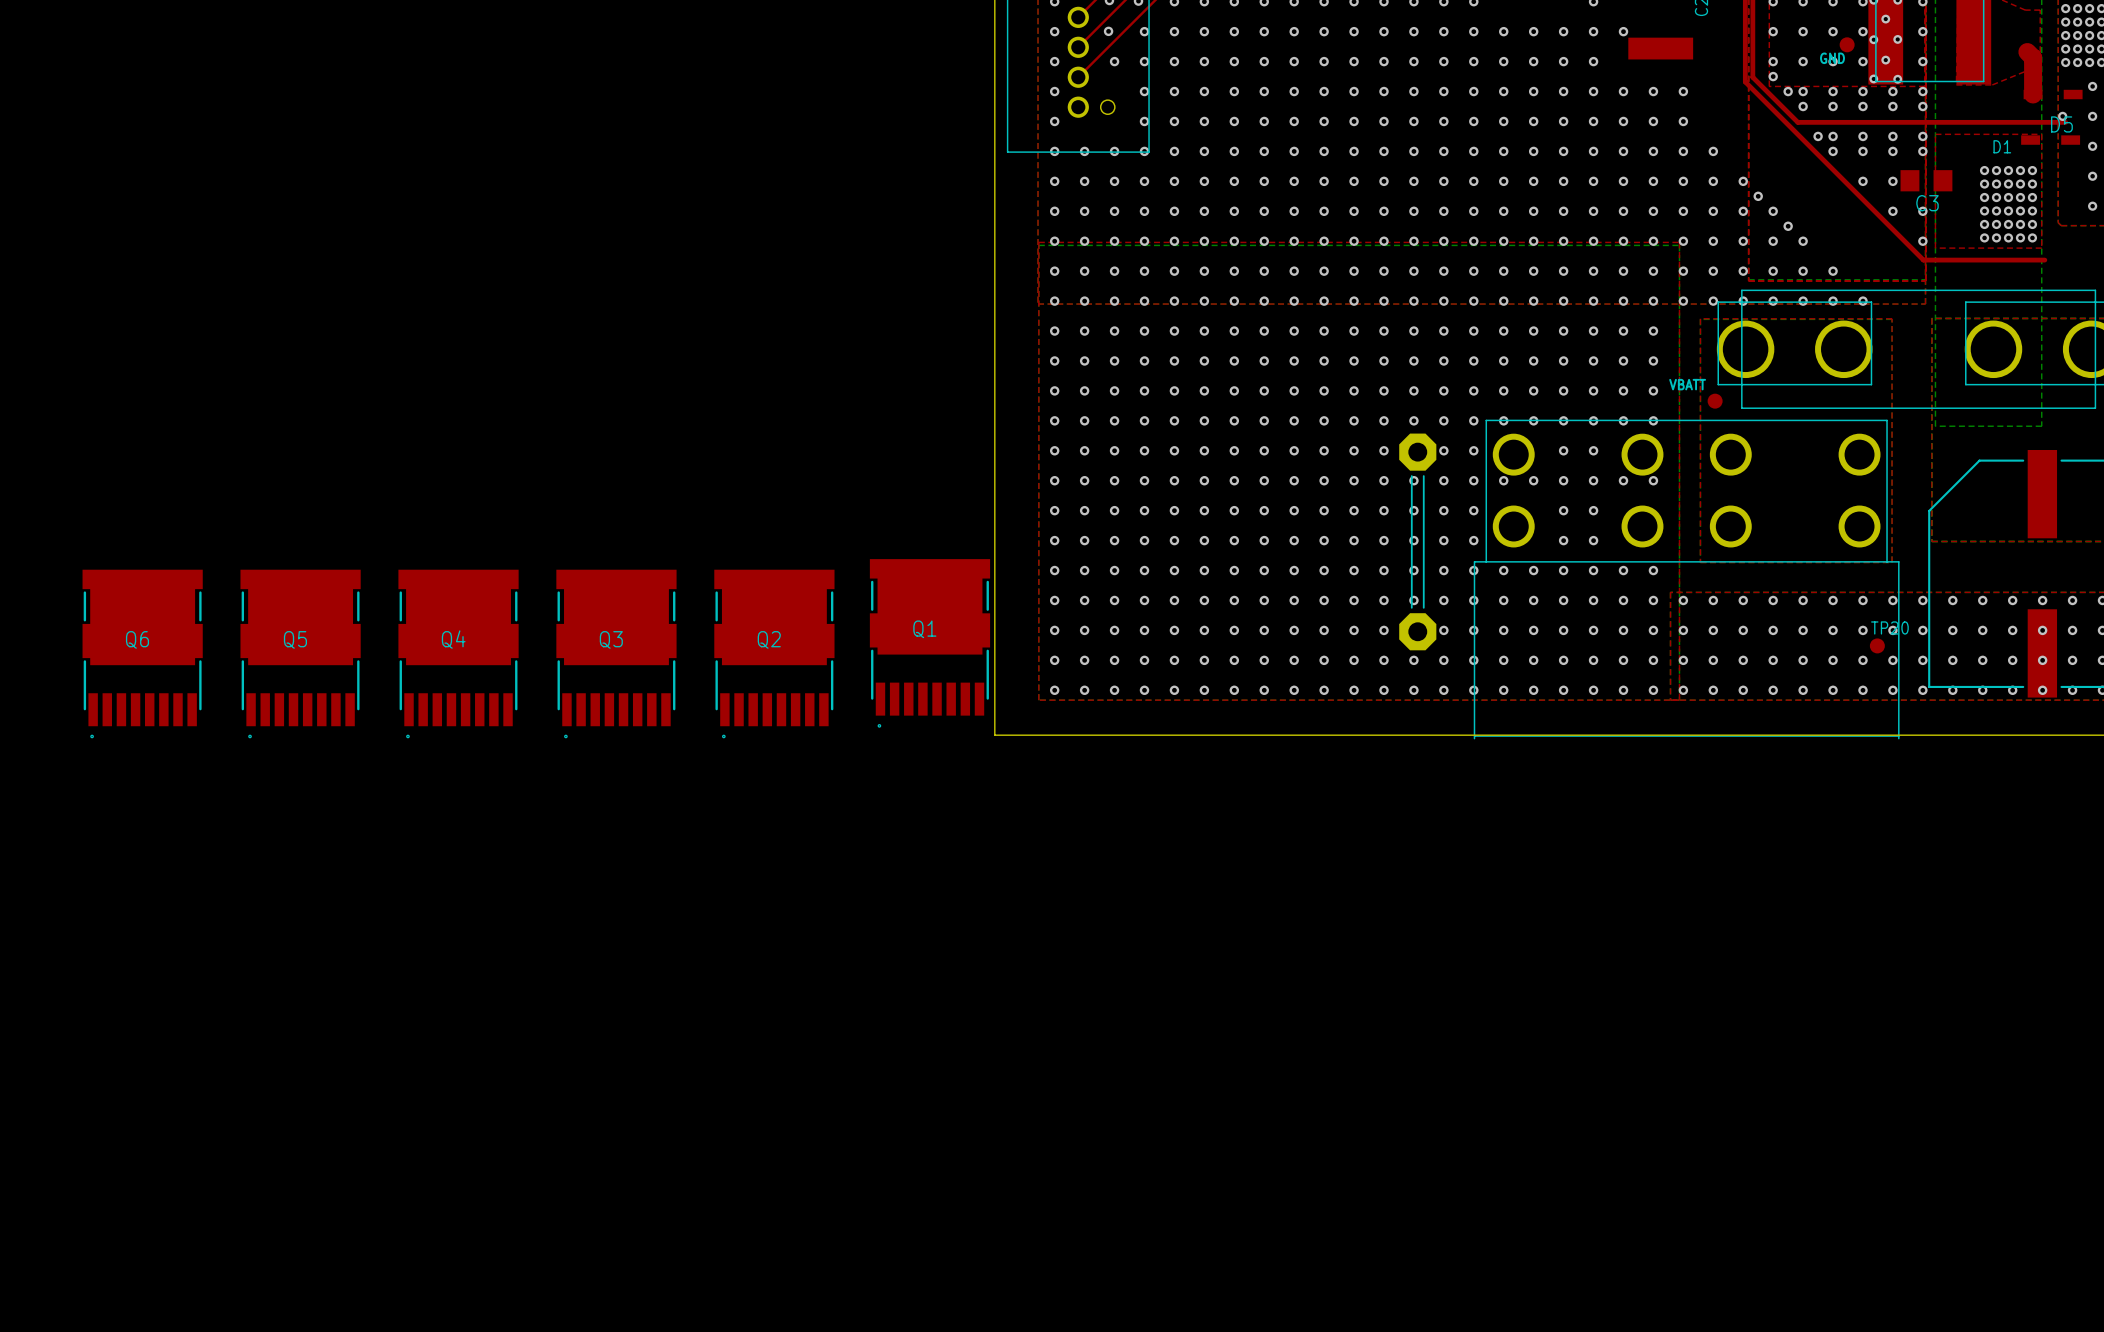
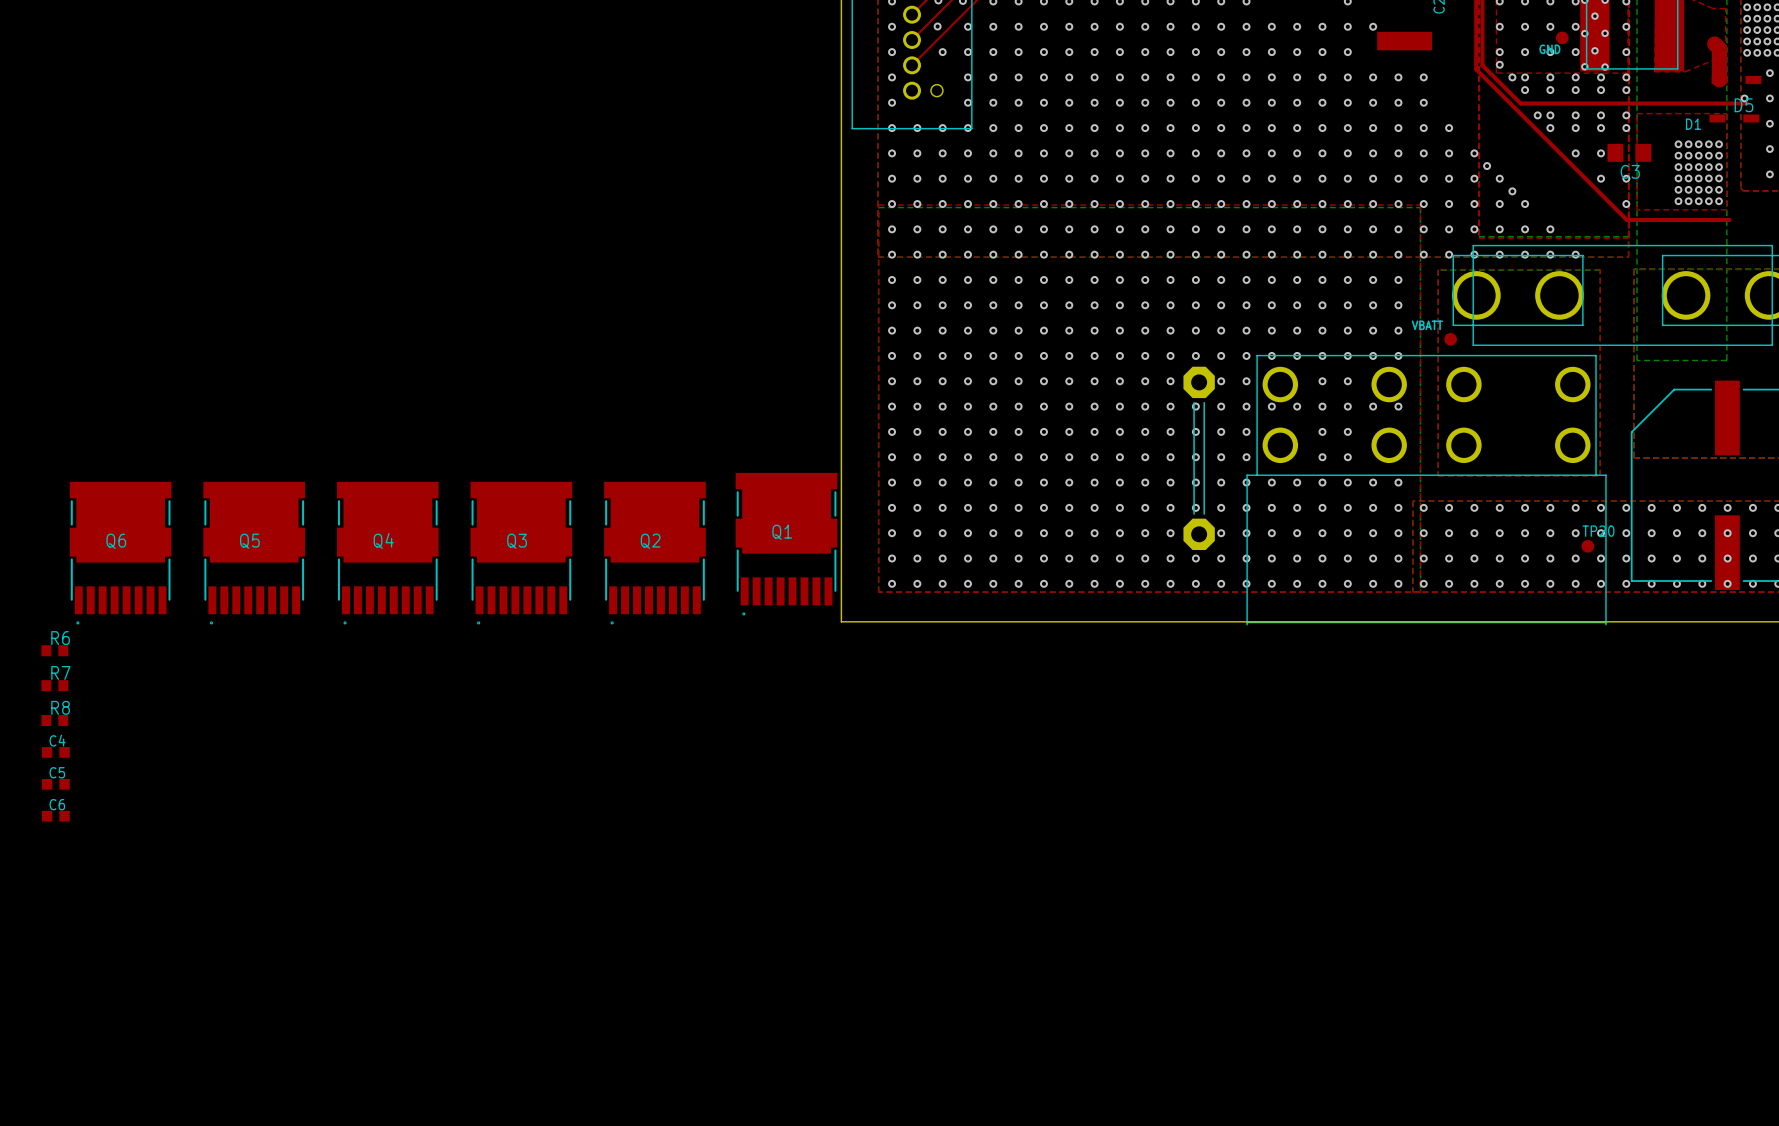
R6: none -> (54, 650)
R7: none -> (54, 685)
R8: none -> (54, 720)
C4: none -> (55, 752)
C5: none -> (55, 784)
C6: none -> (55, 816)

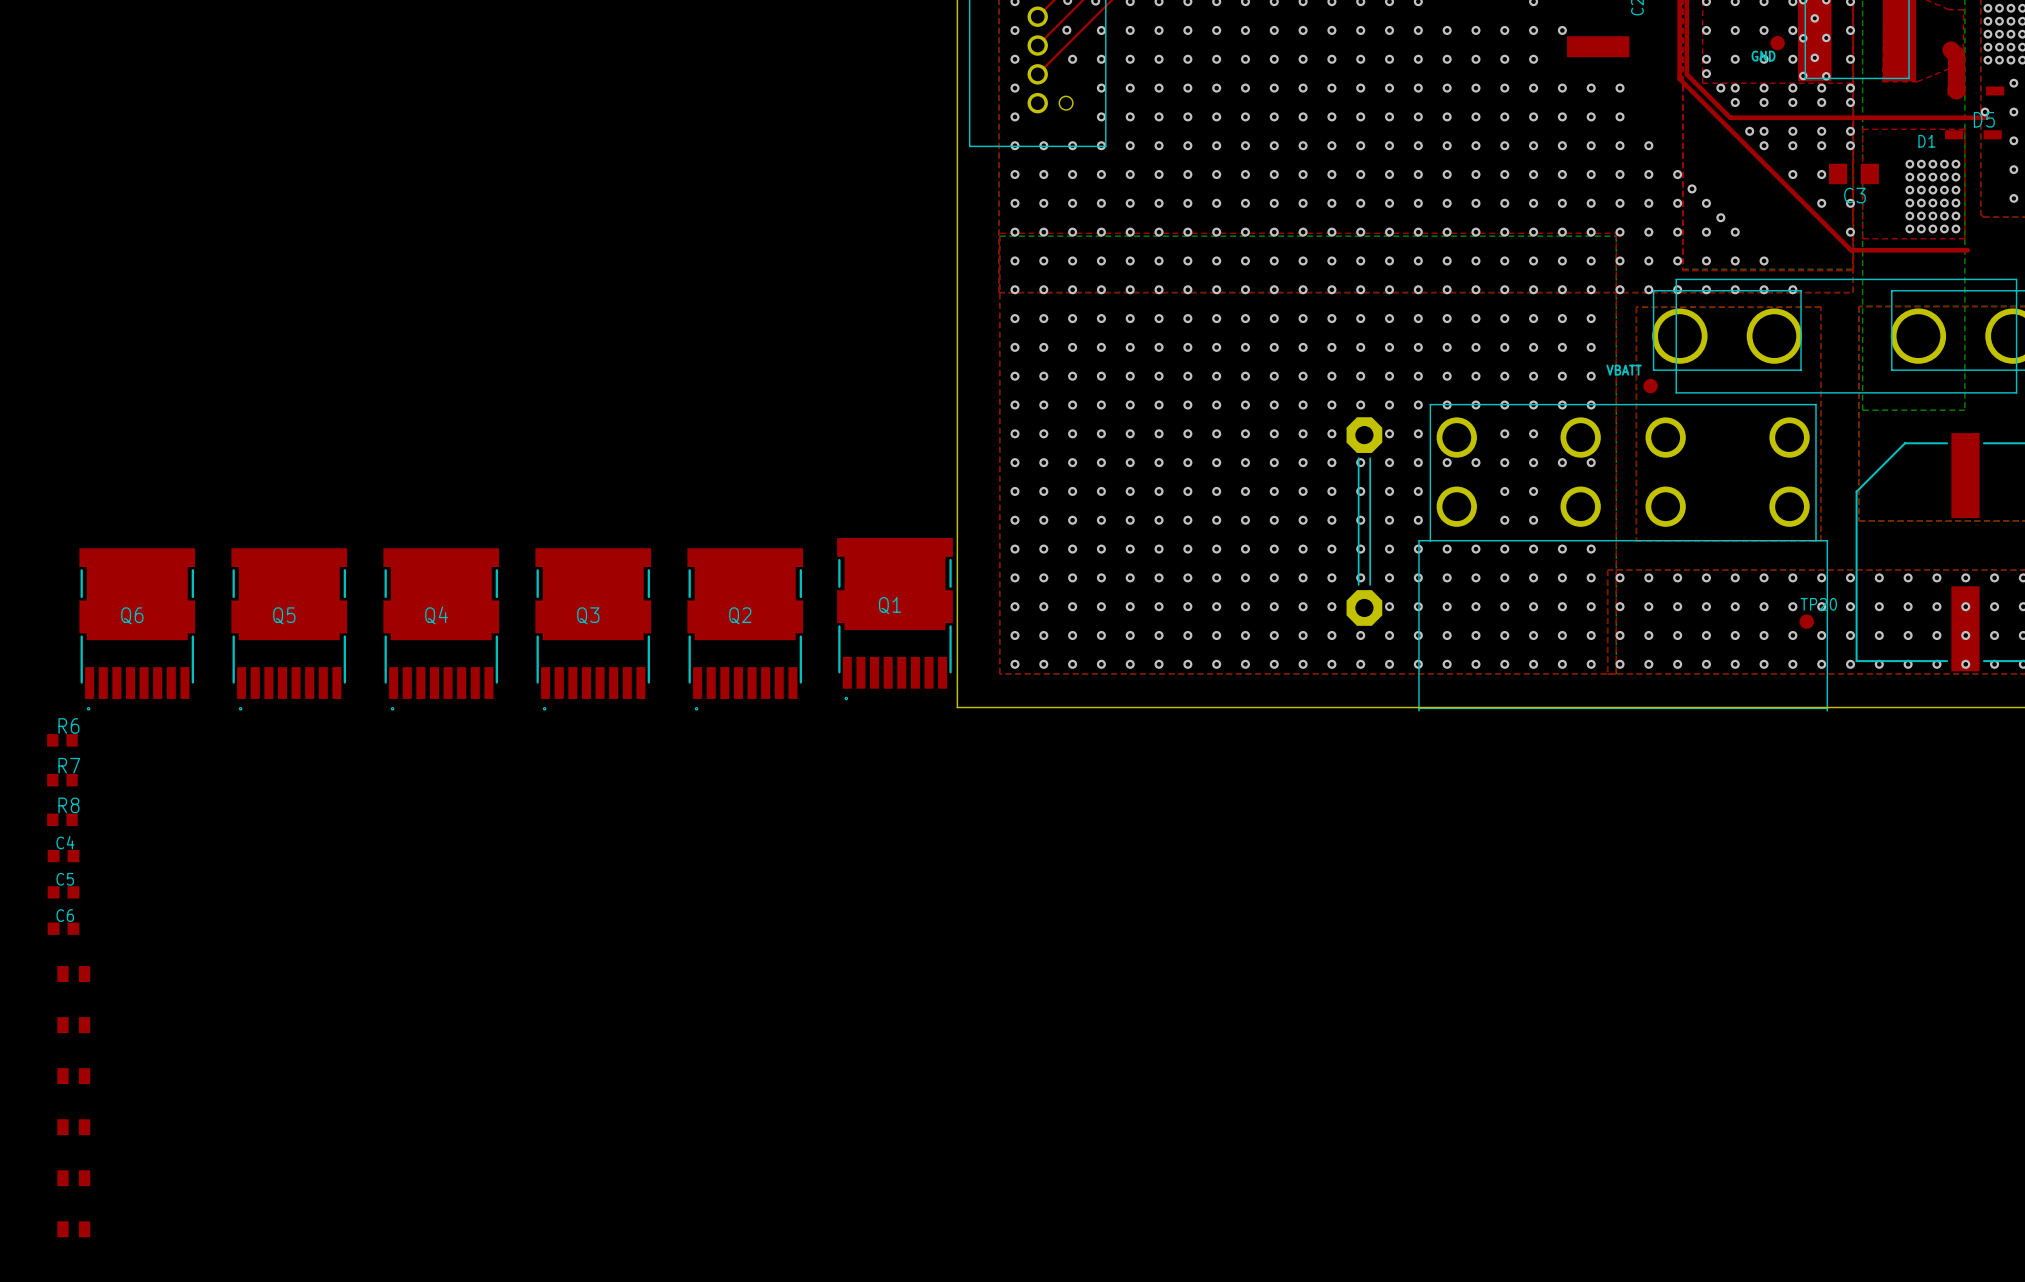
part: none -> (73, 974)
part: none -> (73, 1025)
part: none -> (73, 1076)
part: none -> (73, 1127)
part: none -> (73, 1178)
part: none -> (73, 1229)

